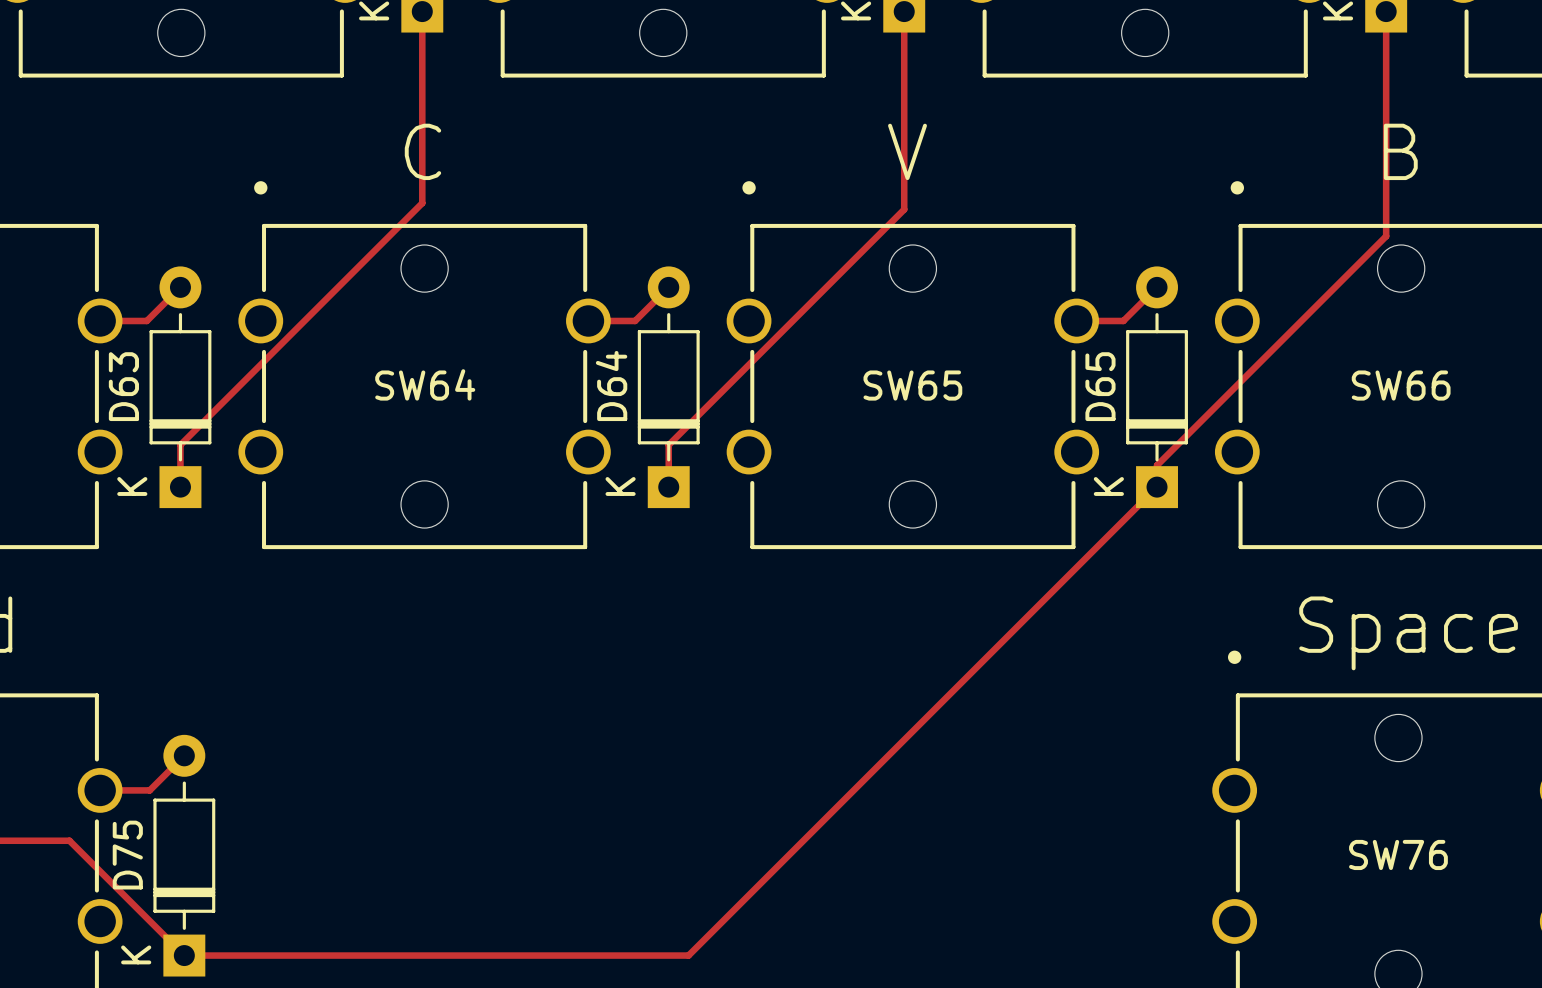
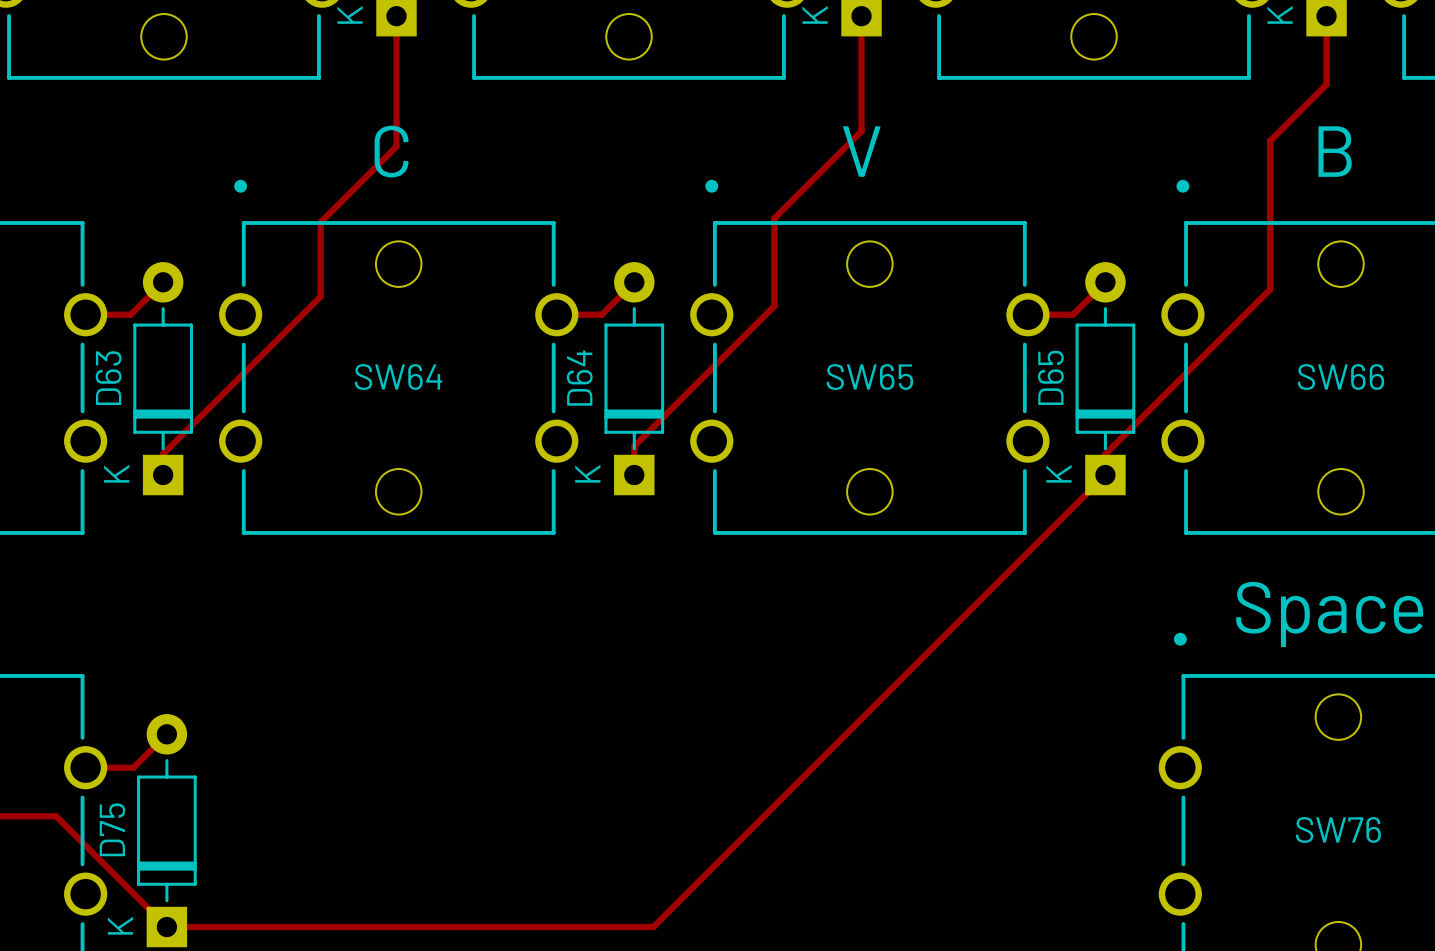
track: (1386, 82) (1386, 236) (1327, 294) -> (1326, 84) (1270, 140) (1270, 289)
track: (904, 130) (904, 209) (668, 445) (668, 457) -> (861, 131) (774, 218) (774, 306) (634, 446)
track: (422, 146) (422, 203) (180, 445) (180, 465) -> (396, 146) (320, 222) (320, 296) (163, 454)

